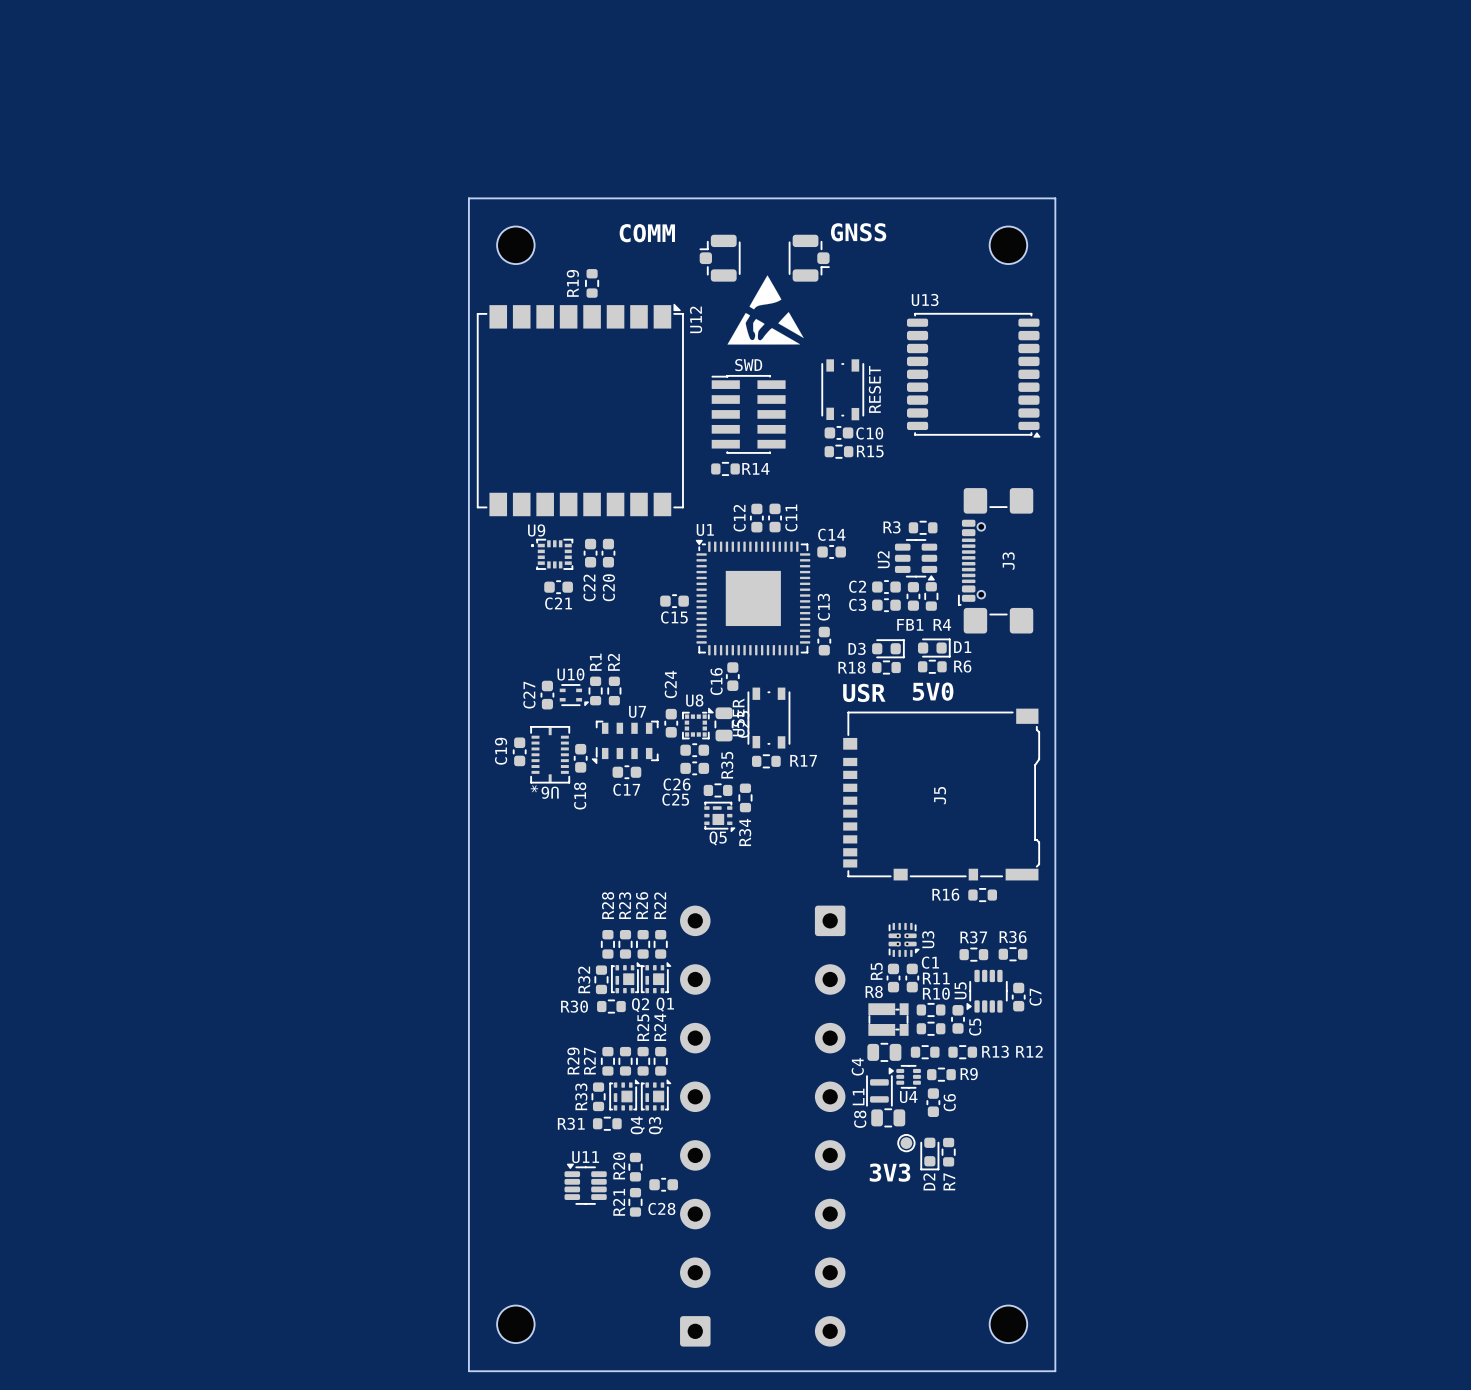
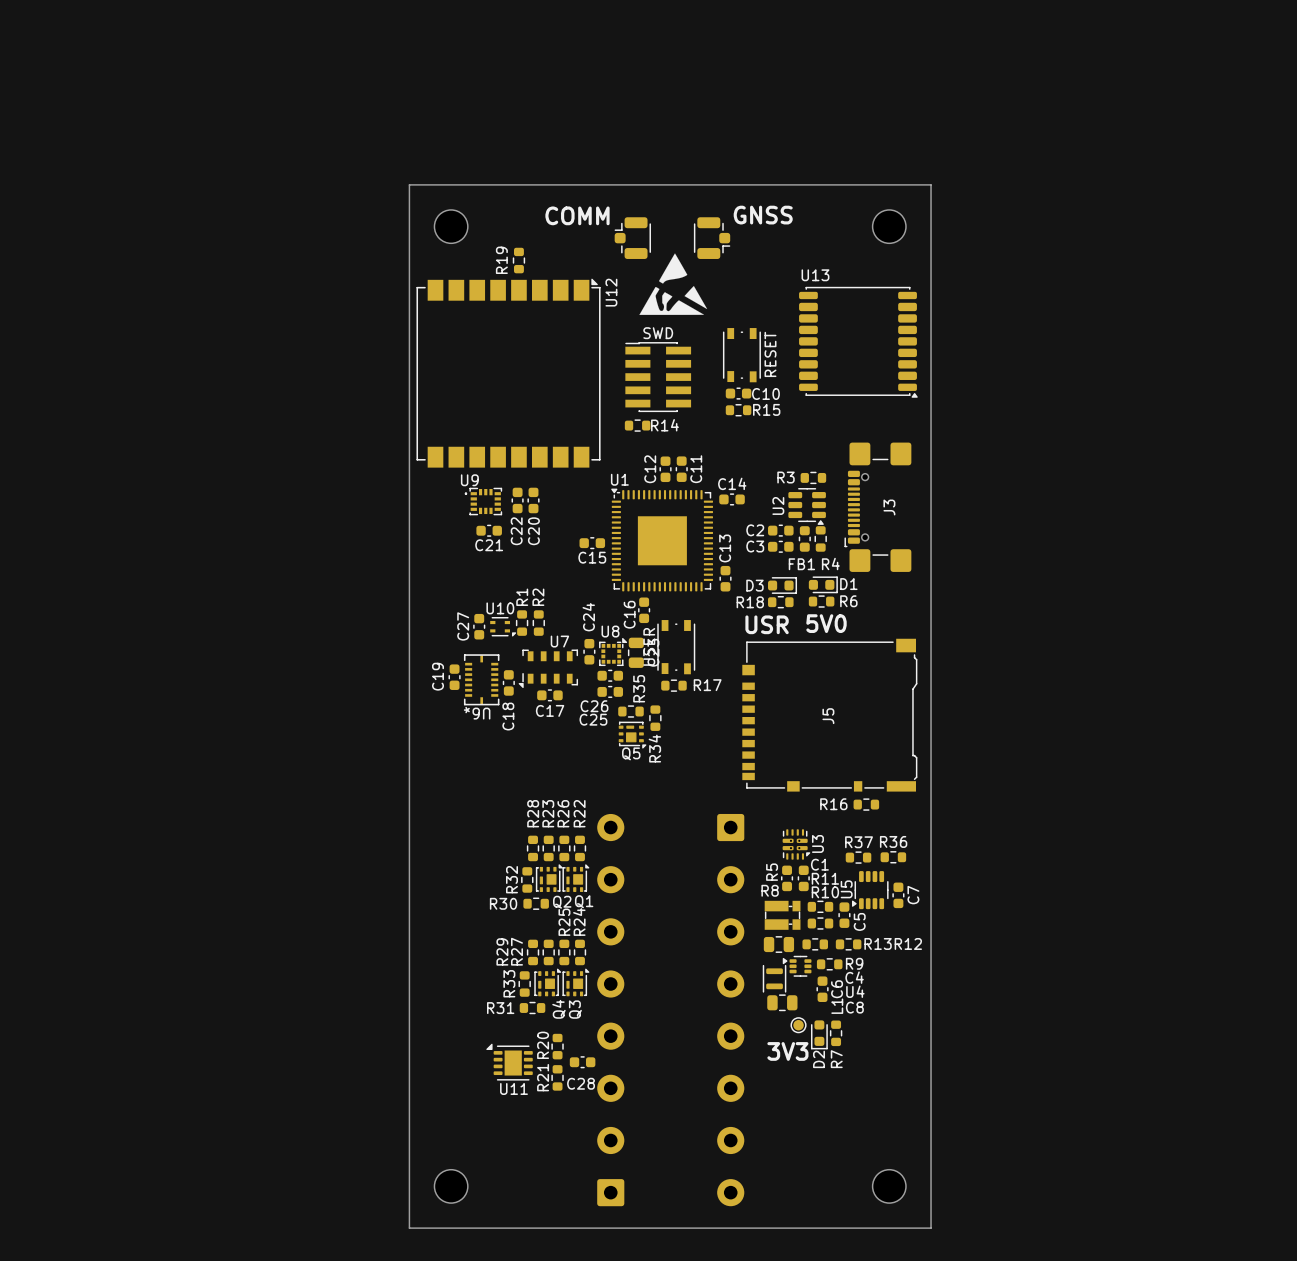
C4 name rotation: 0° (857, 1066) -> 90° clockwise (854, 977)
C4 name position: C4 (857, 1066) -> C4 (854, 977)
L1 name position: L1 (858, 1096) -> L1 (837, 1006)
U4 name position: U4 (908, 1097) -> U4 (855, 991)
C8 name rotation: 0° (860, 1119) -> 90° clockwise (854, 1007)
C8 name position: C8 (860, 1119) -> C8 (854, 1007)
U11 name position: U11 (585, 1157) -> U11 (513, 1088)
U11 footprint: [564, 1163, 607, 1205] -> [486, 1043, 533, 1081]

